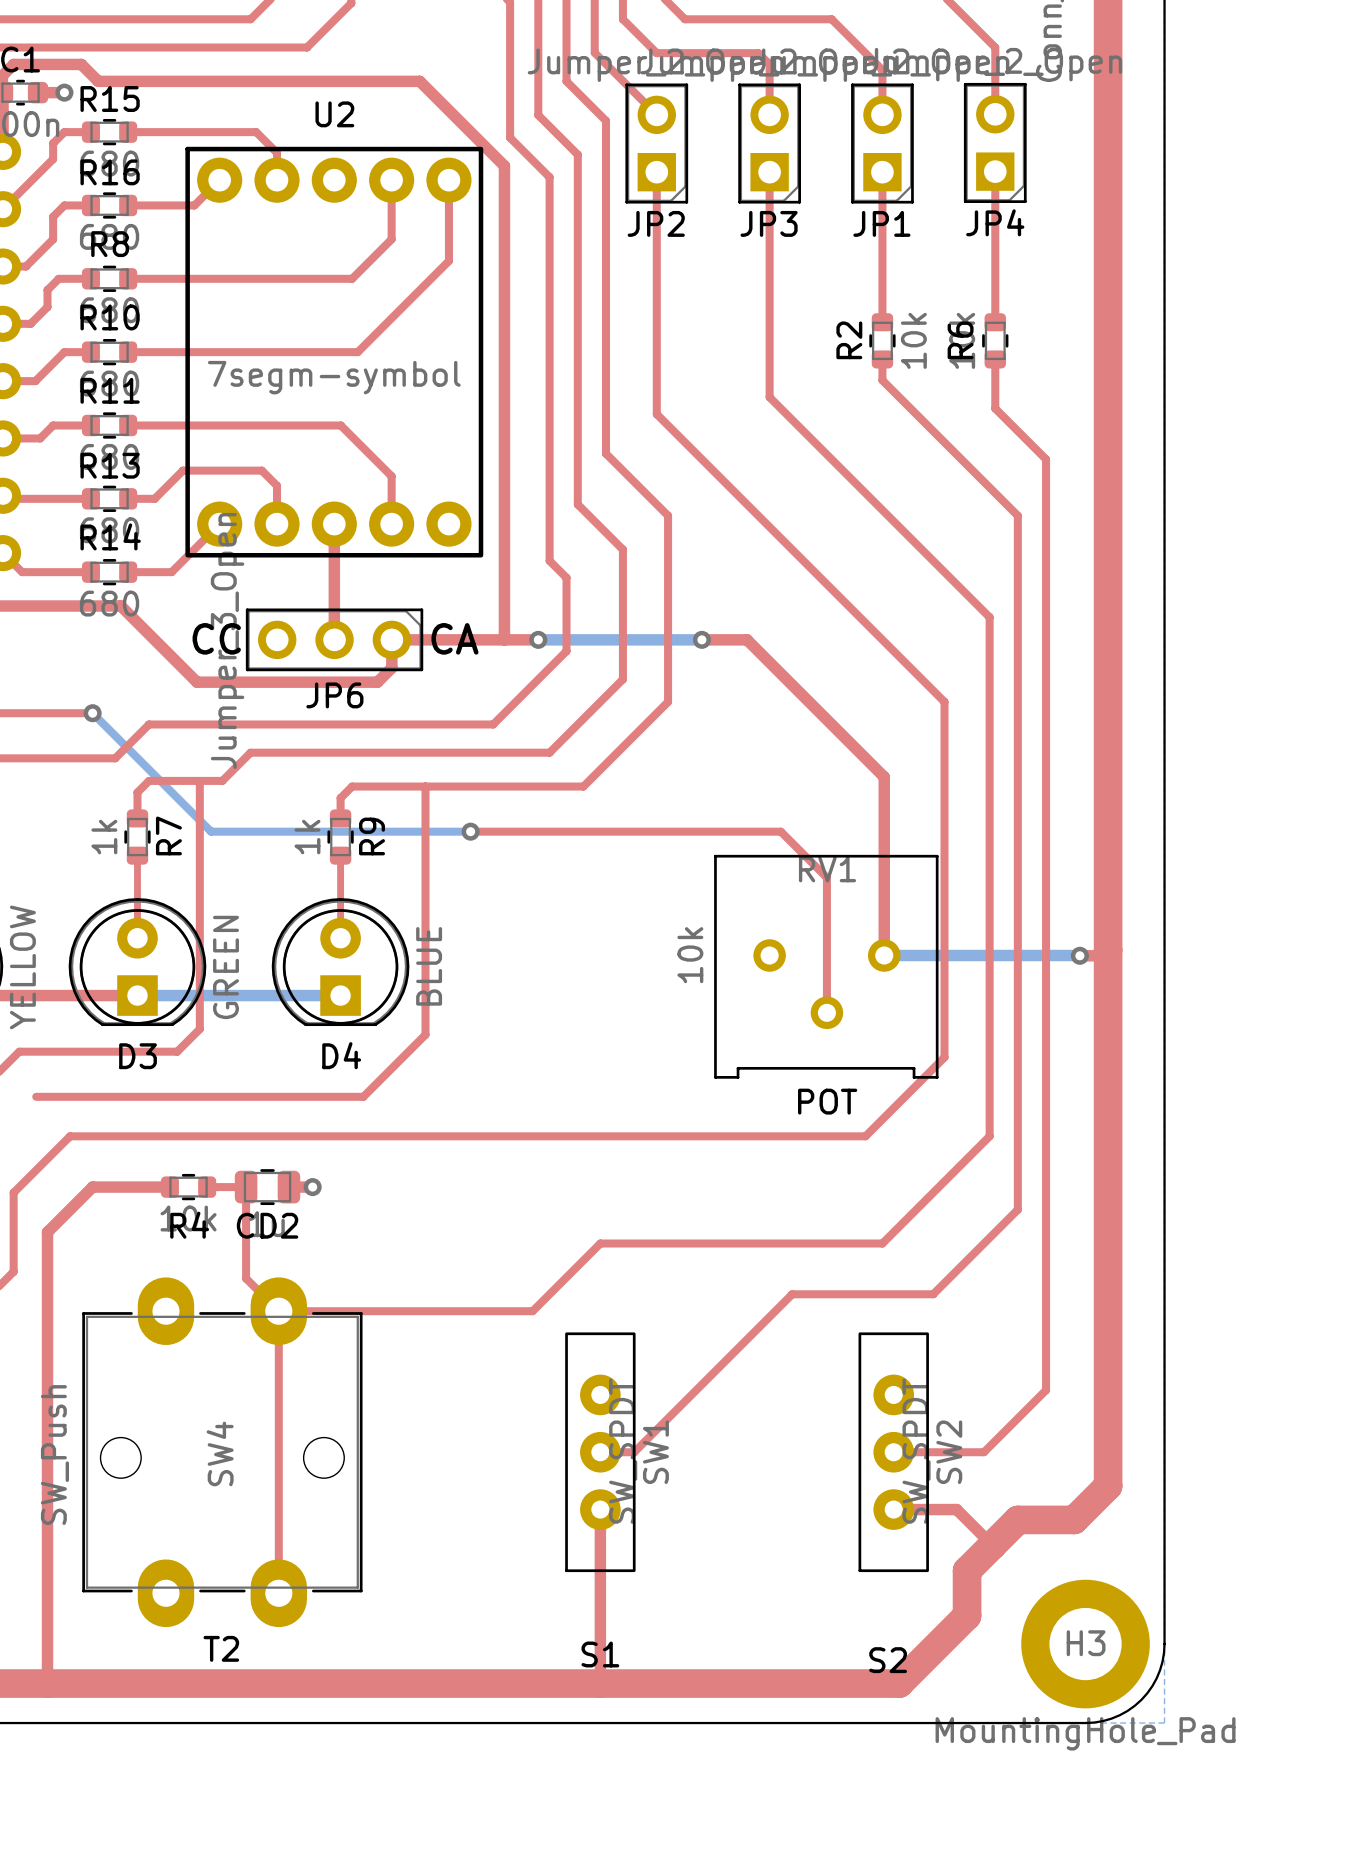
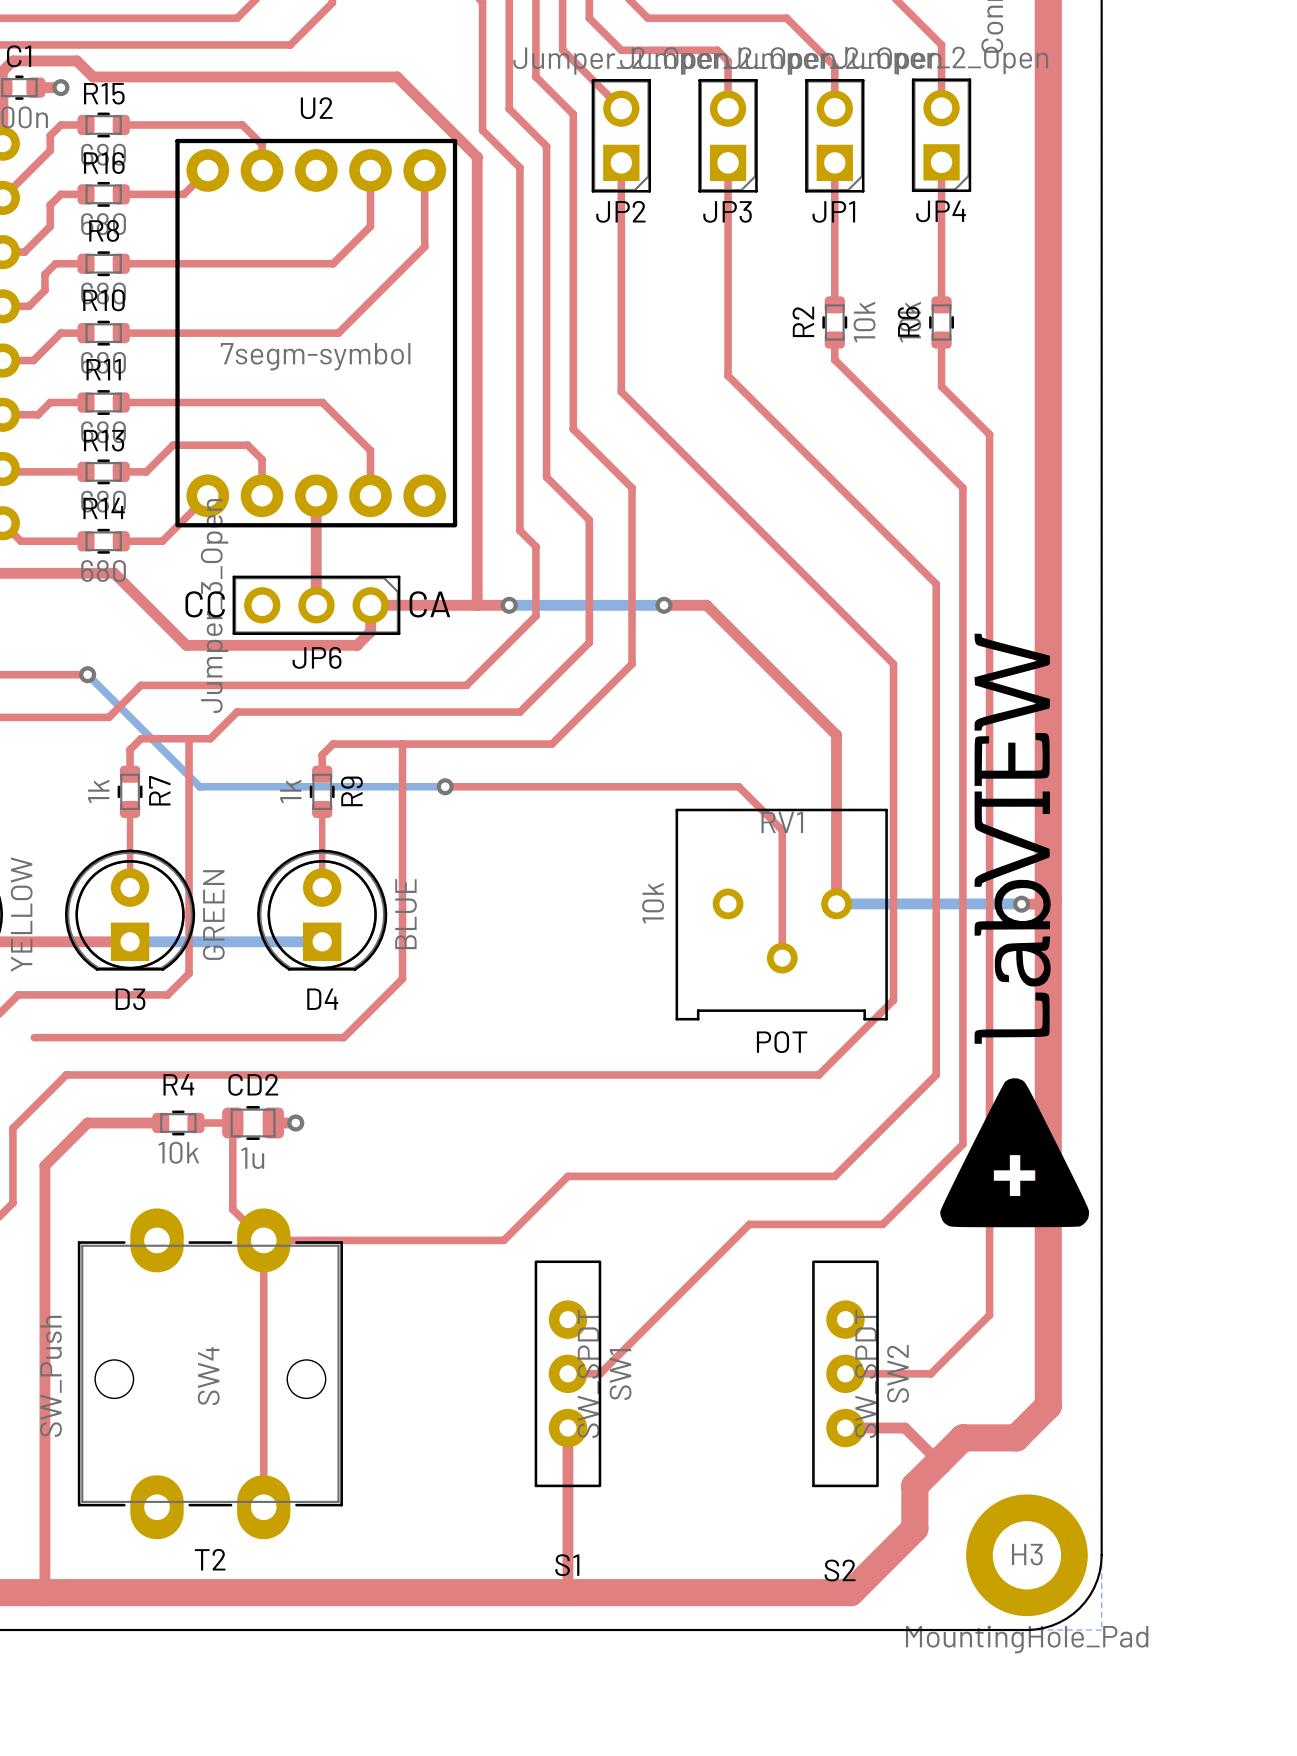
drawing: none -> [940, 633, 1090, 1228]
R4 name position: R4 (189, 1225) -> R4 (178, 1084)
CD2 name position: CD2 (267, 1225) -> CD2 (253, 1084)

